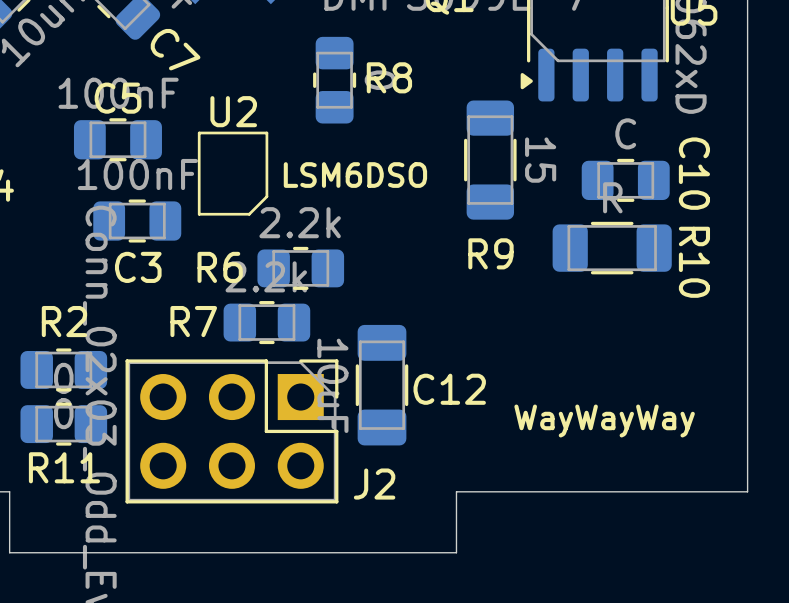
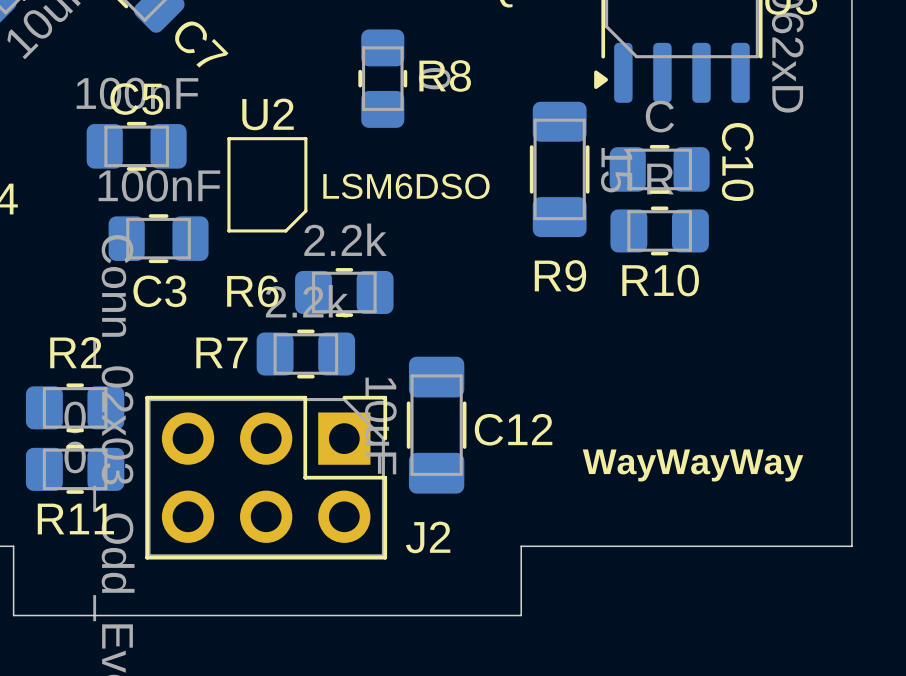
C10 position: (625, 180) -> (659, 169)
R10 footprint: [552, 221, 672, 275] -> [610, 206, 709, 256]
R10 name position: R10 (694, 262) -> R10 (660, 280)

